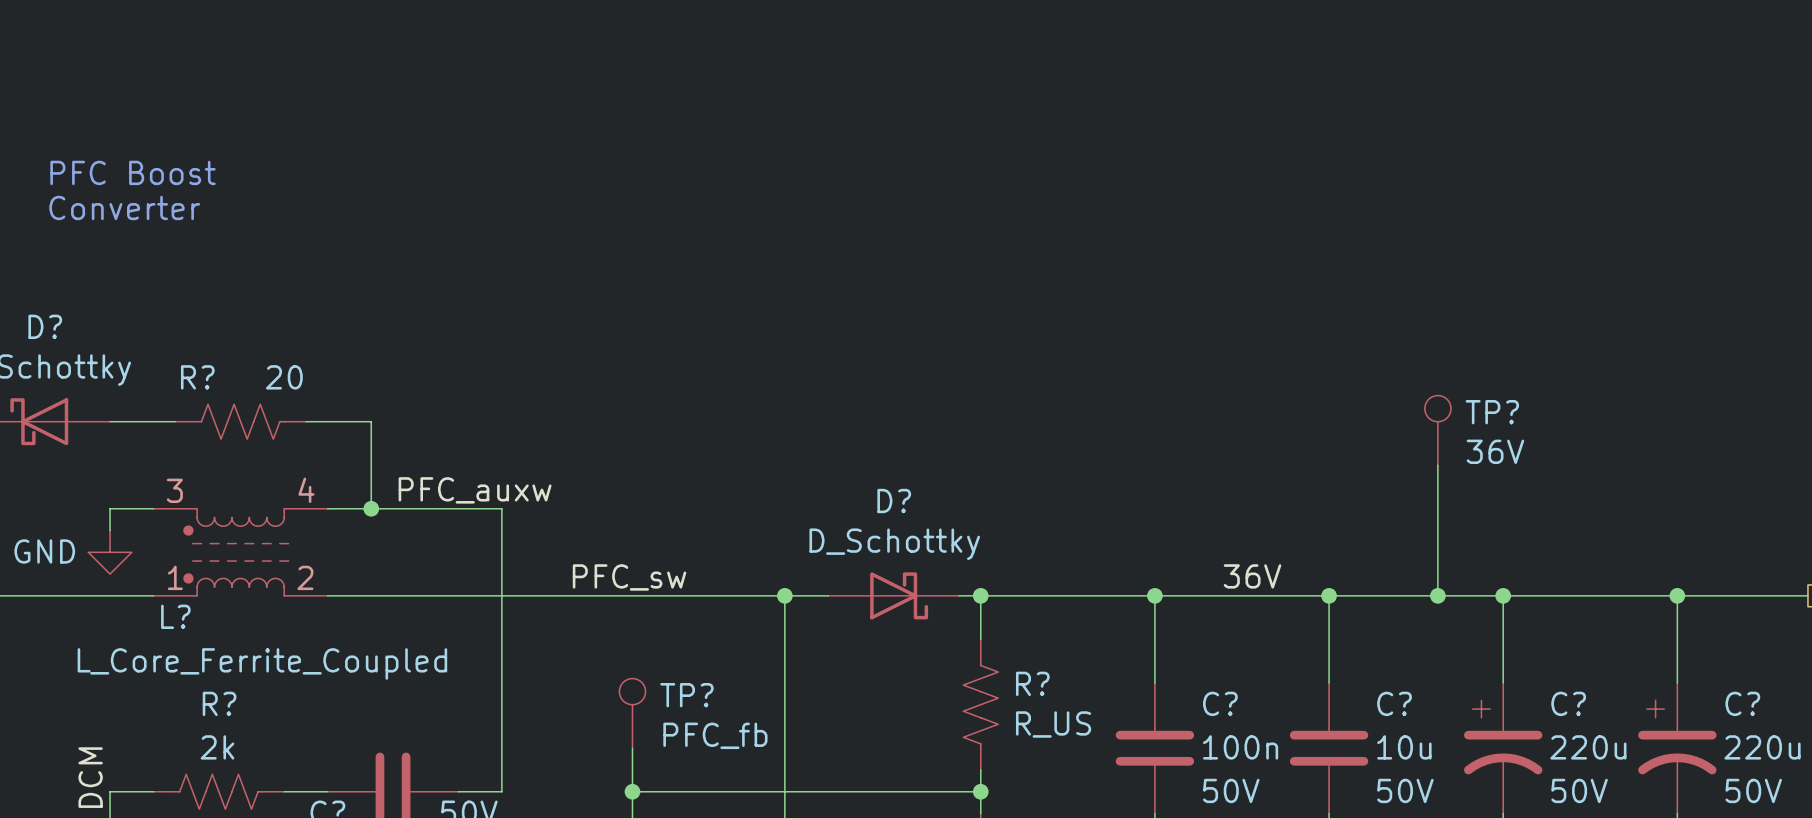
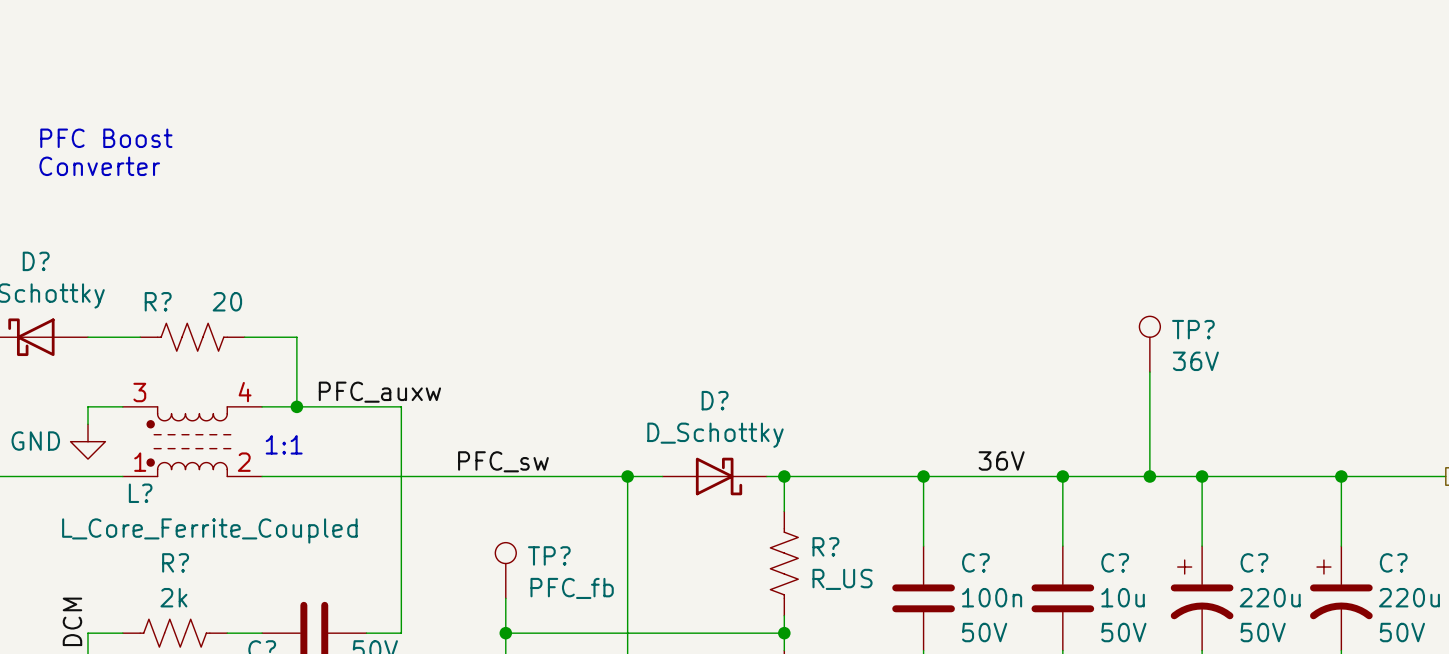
text: none -> 1:1 (284, 444)

